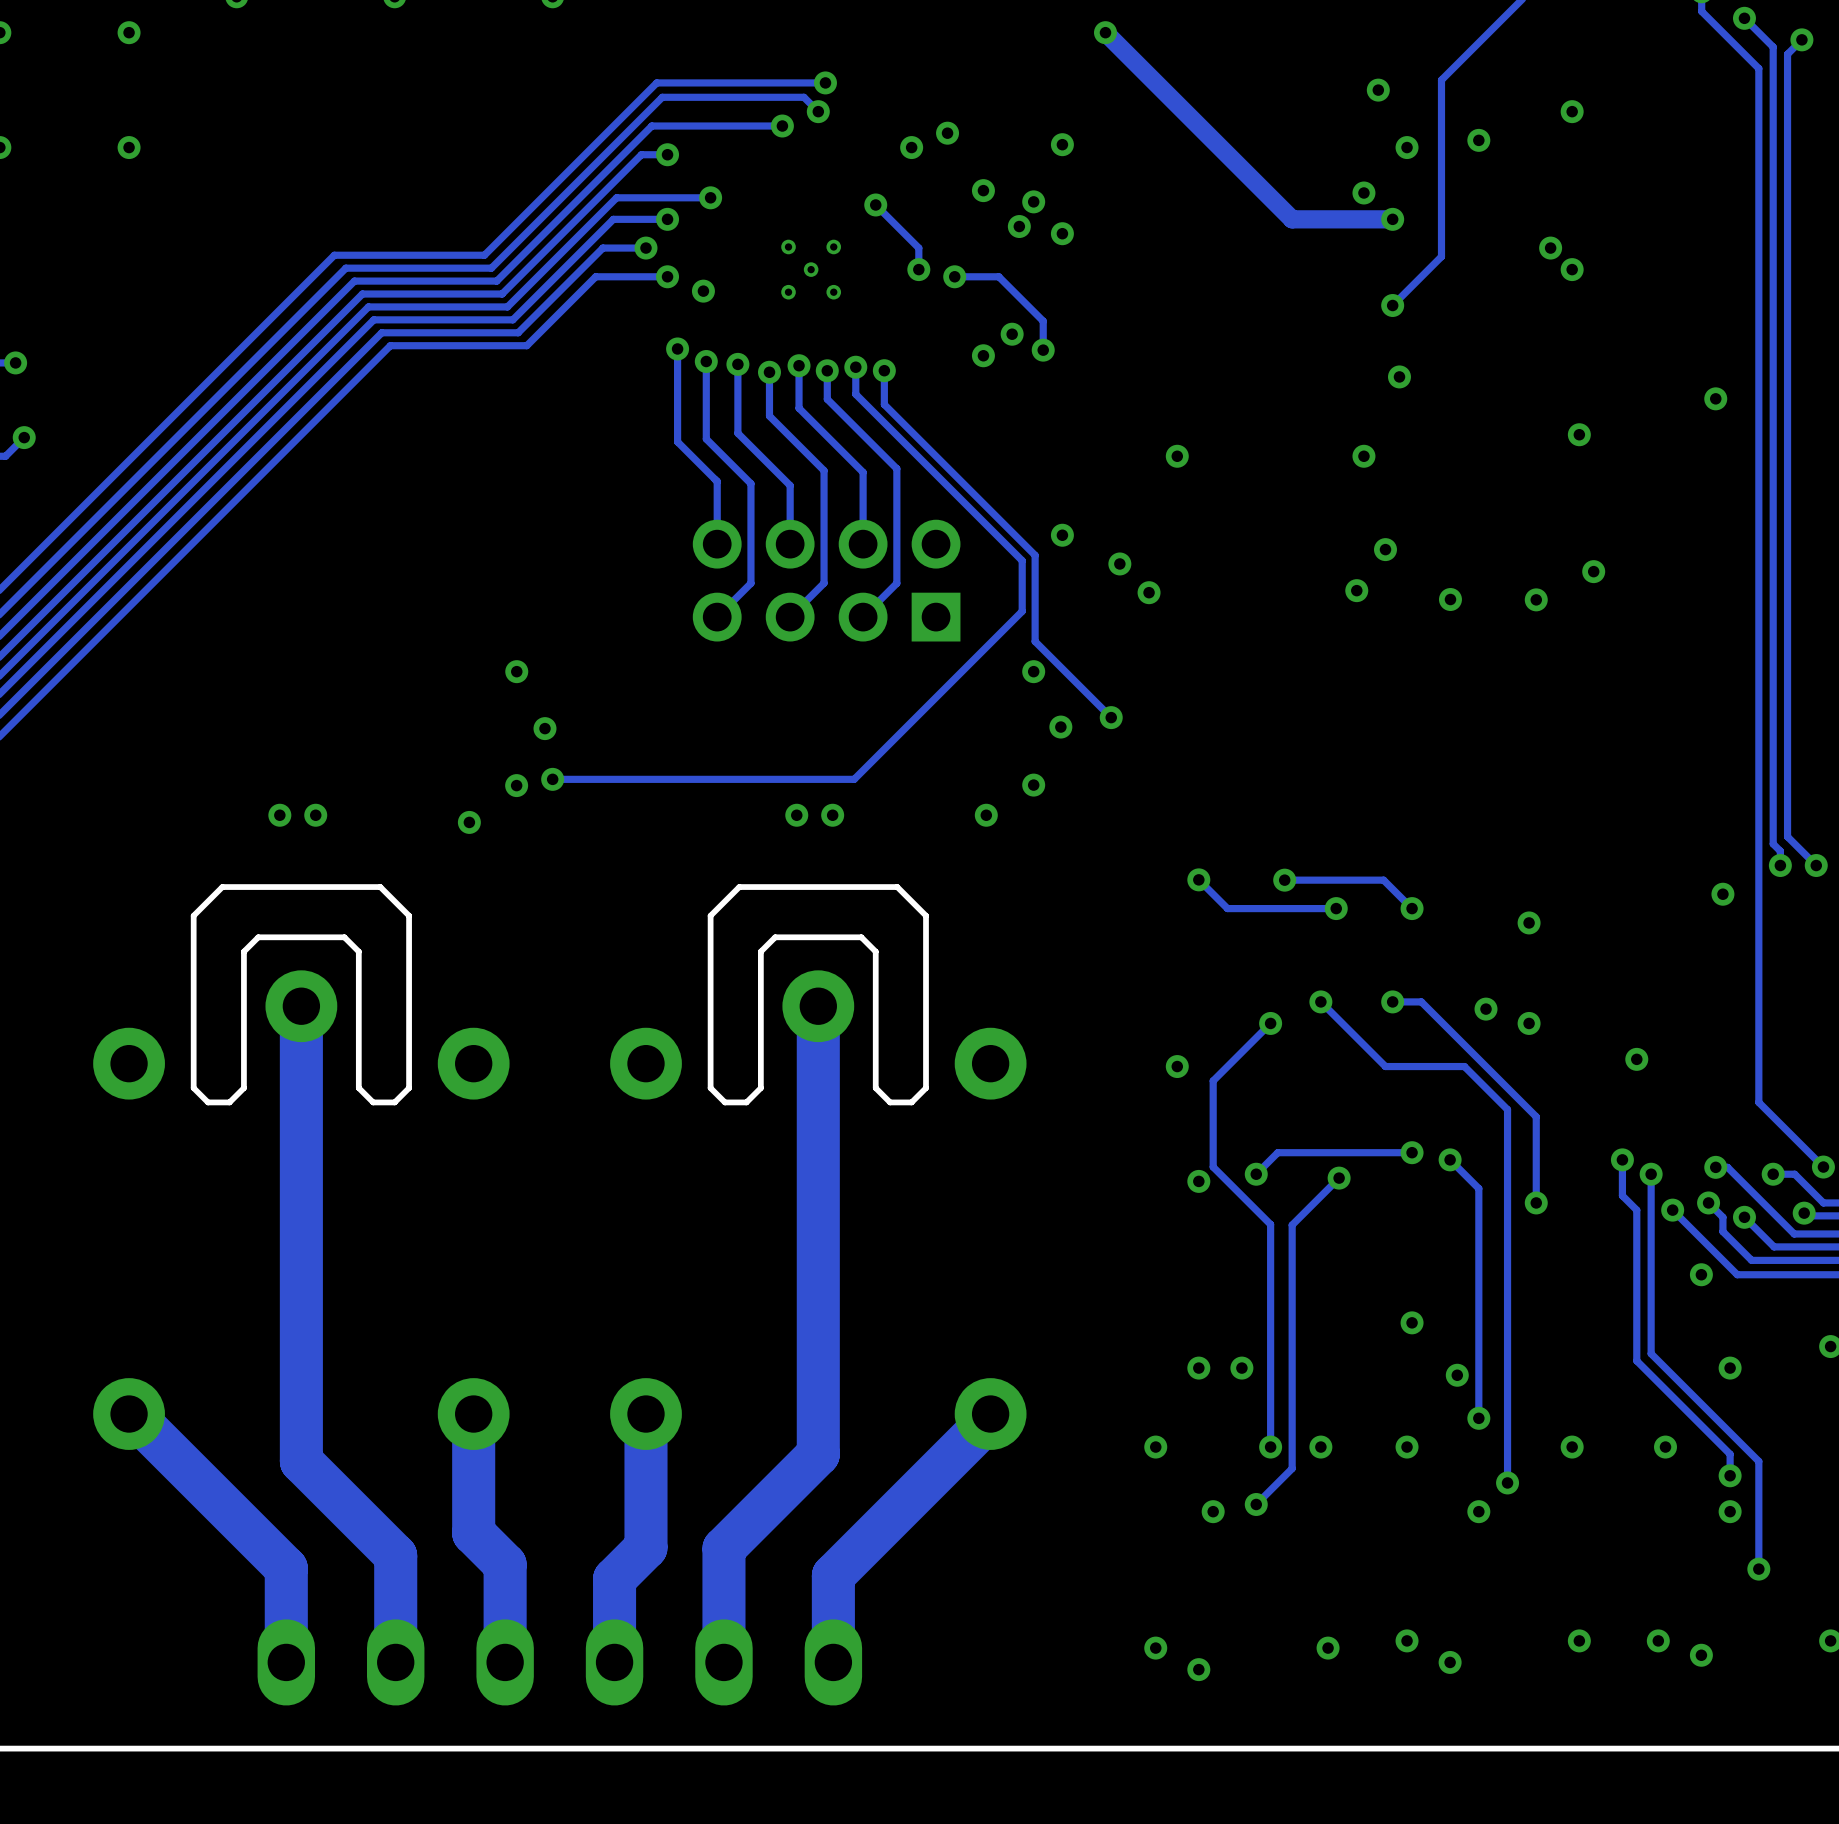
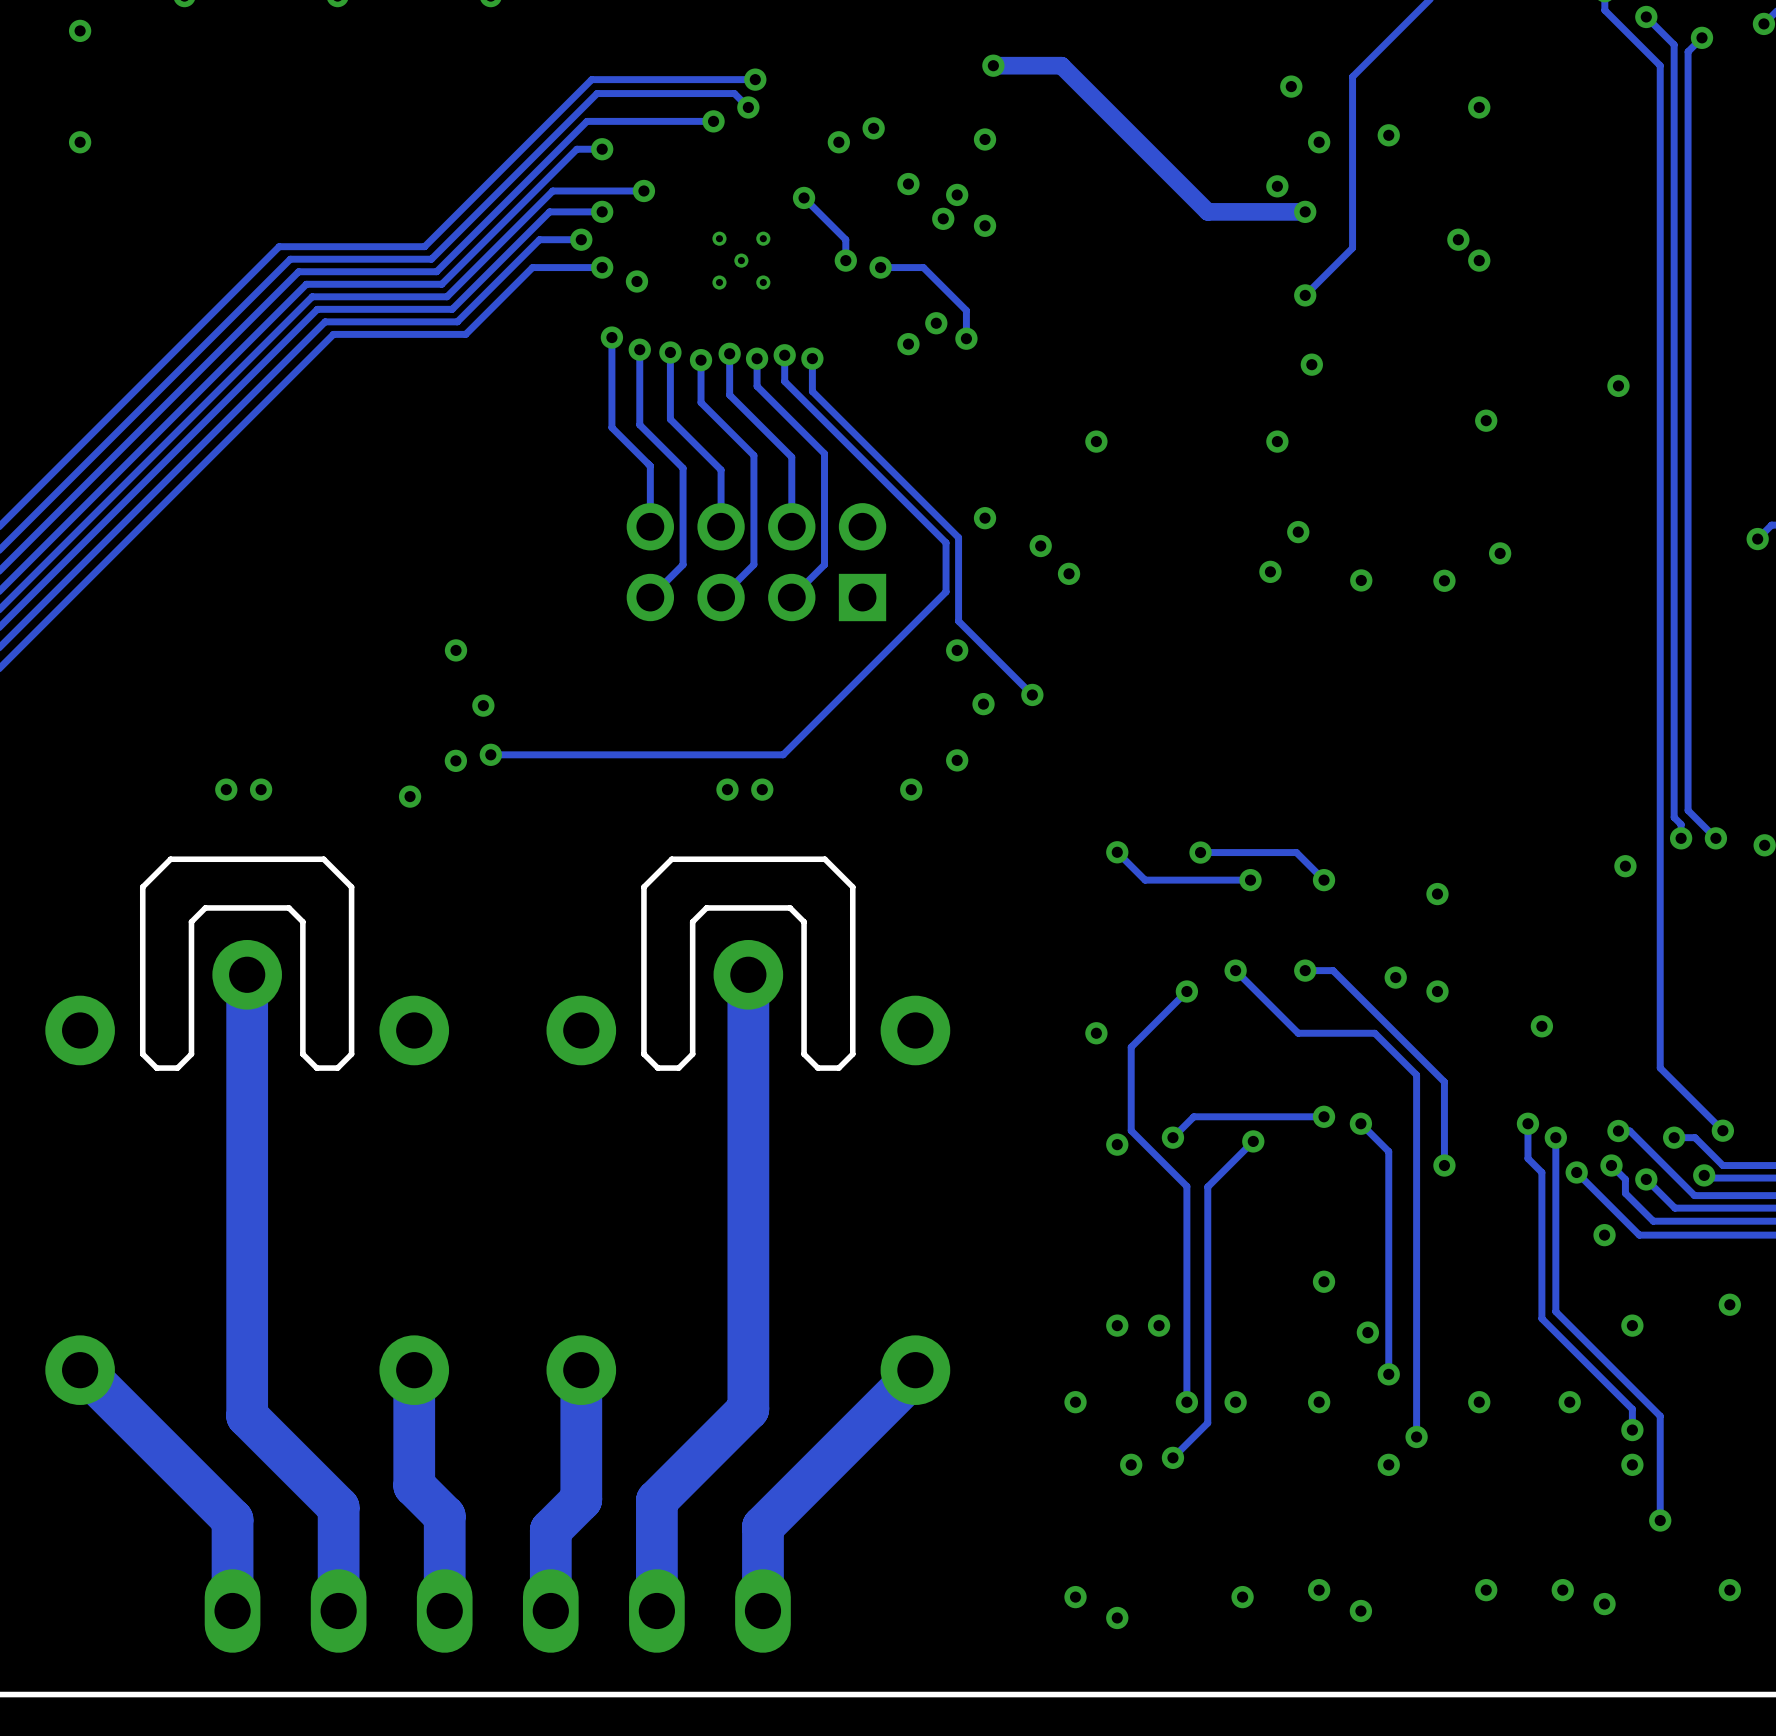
track: (1105, 32) (1141, 68) -> (993, 65) (1061, 65)
via position: (1105, 32) -> (993, 65)

